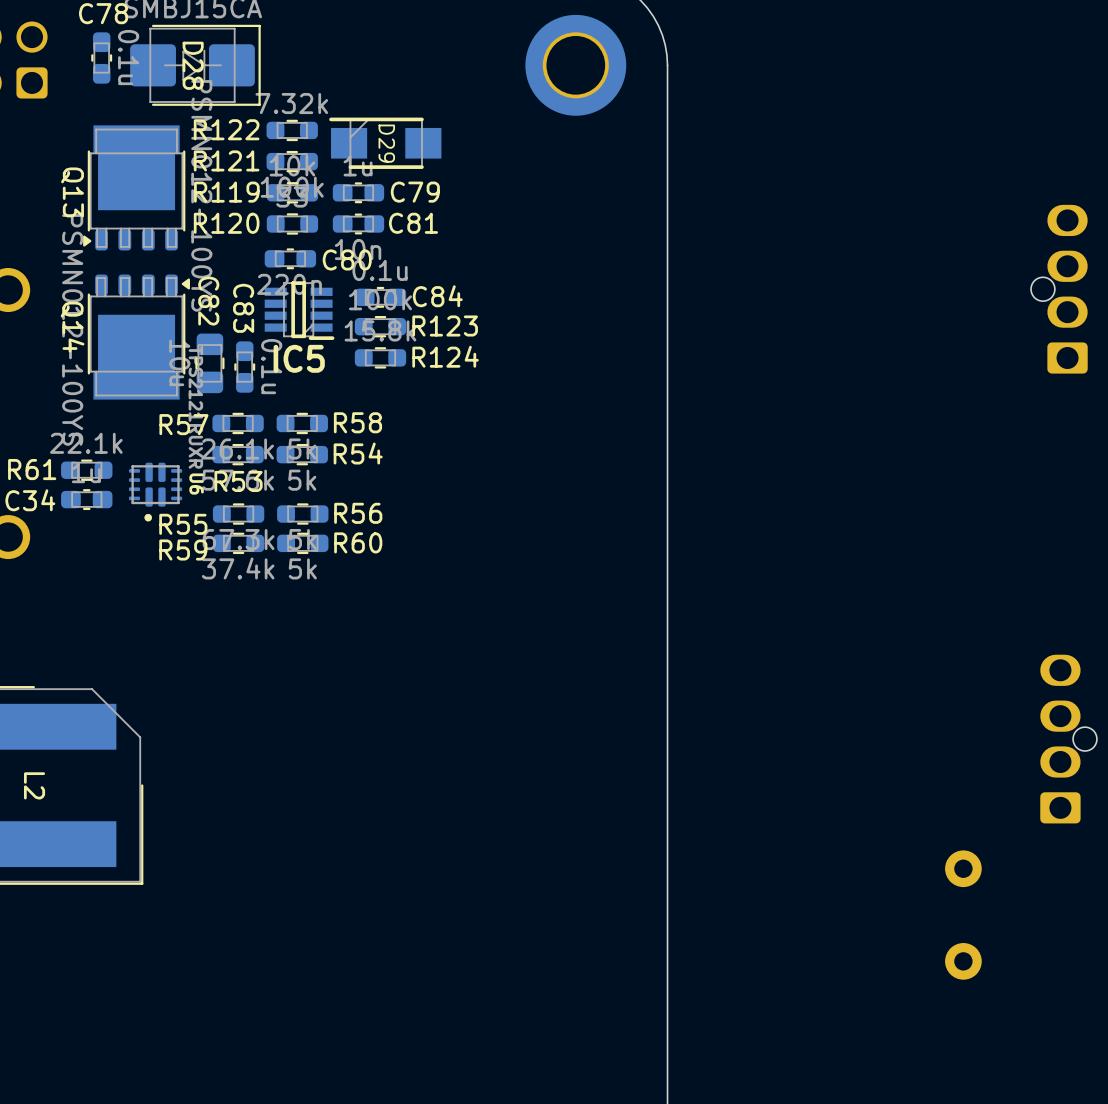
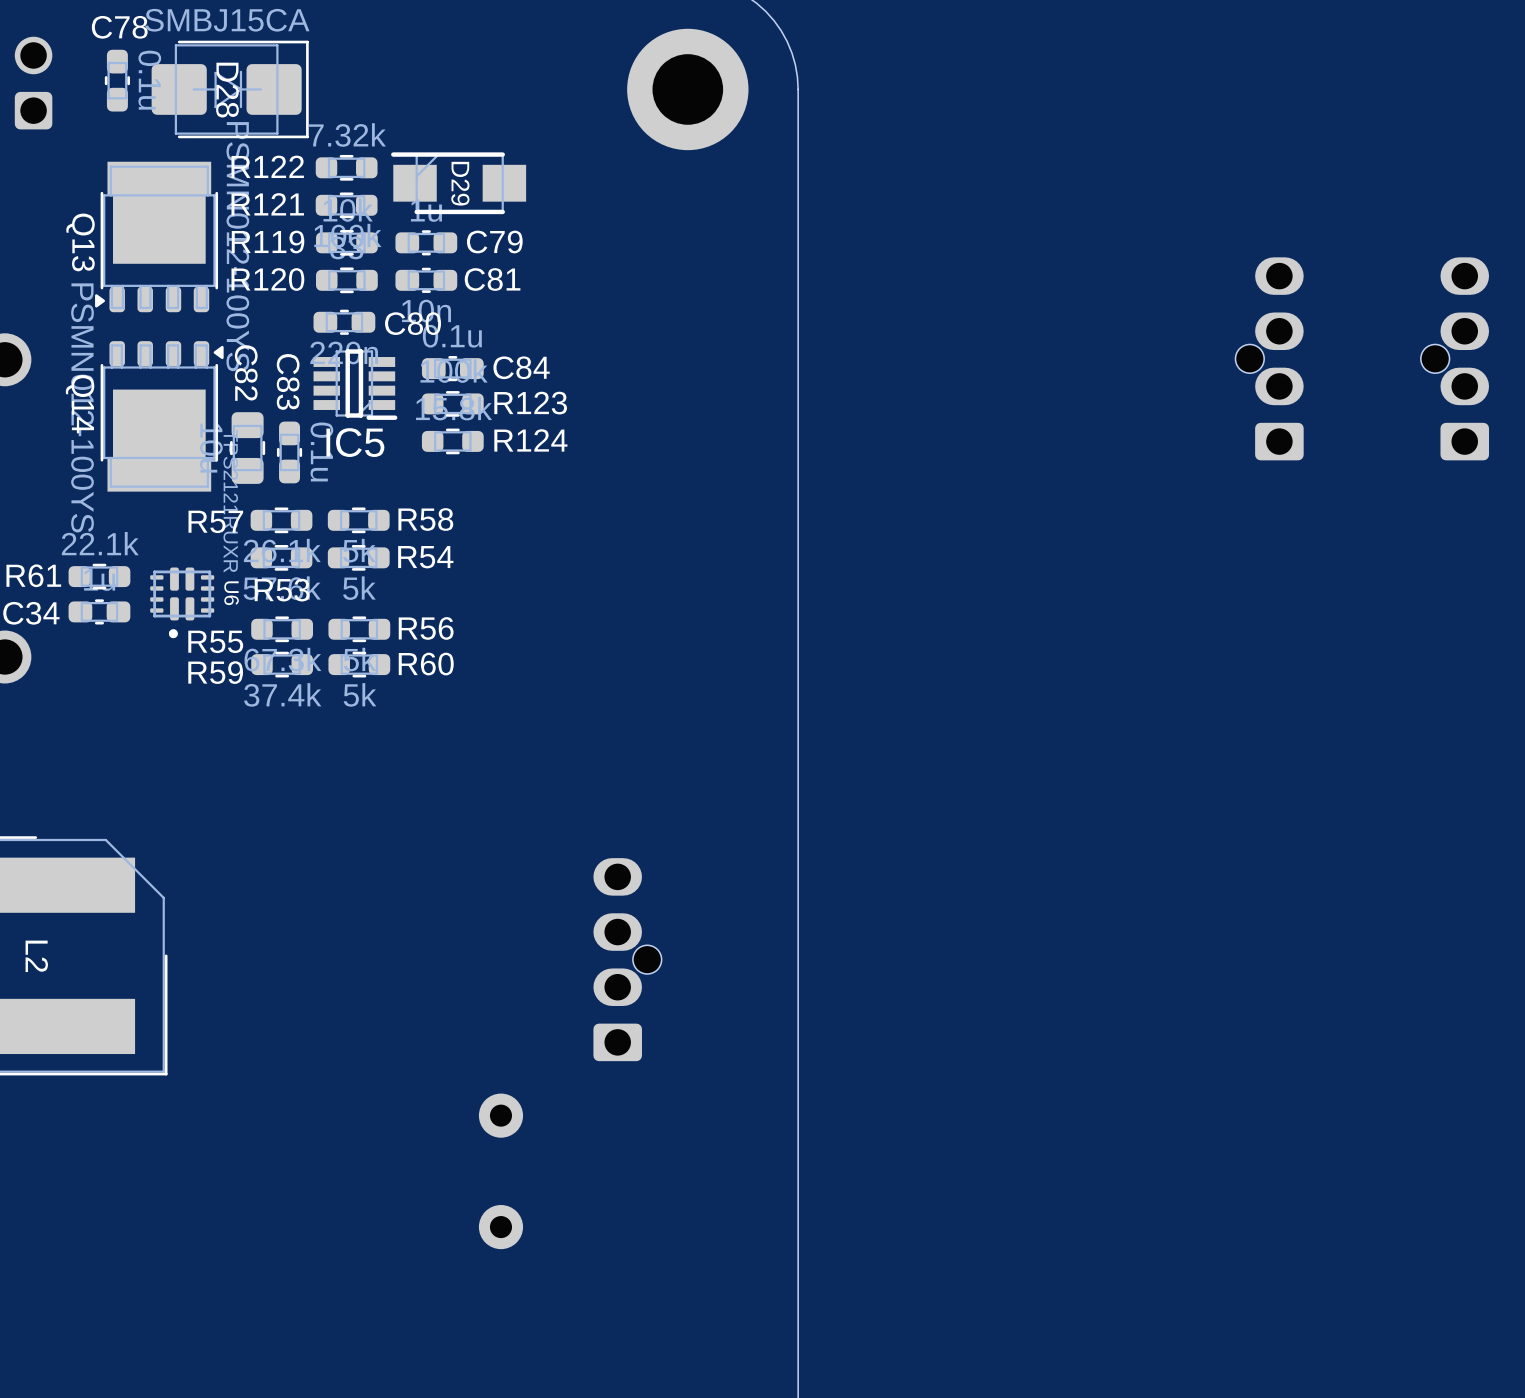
part: (1068, 739) -> none
part: none -> (627, 959)
part: (963, 868) -> none
part: none -> (500, 1115)
part: (963, 961) -> none
part: none -> (500, 1227)

